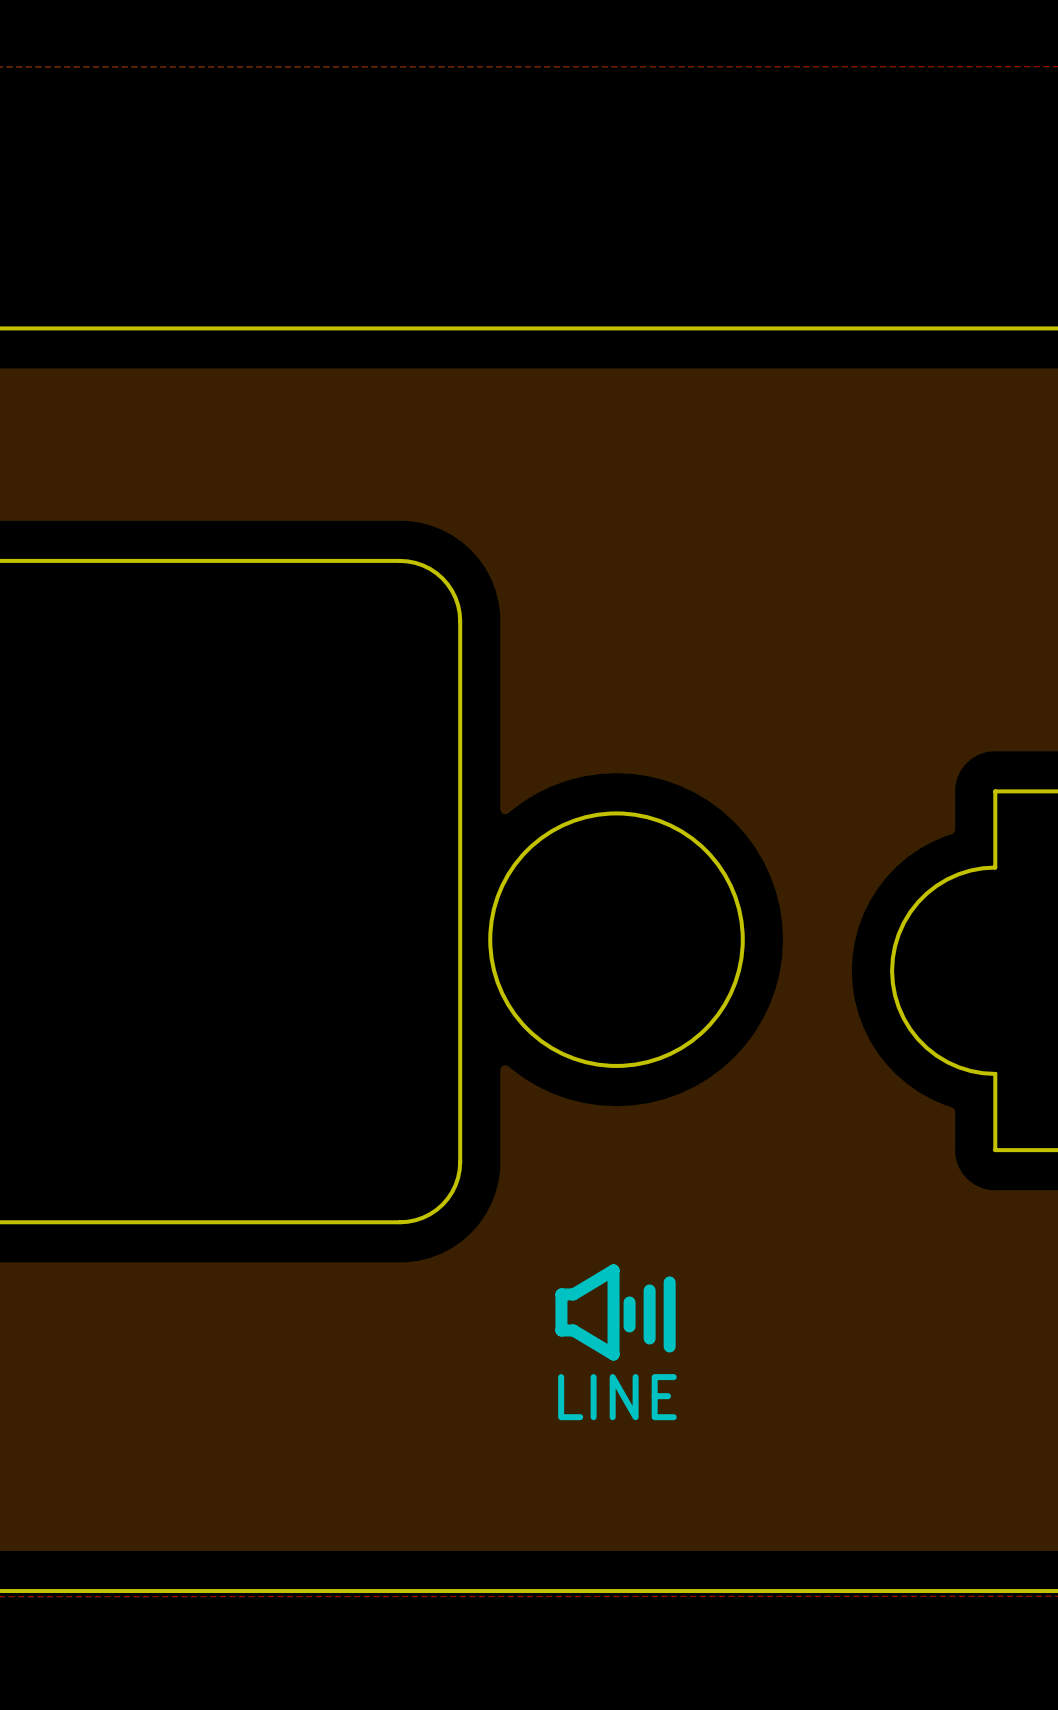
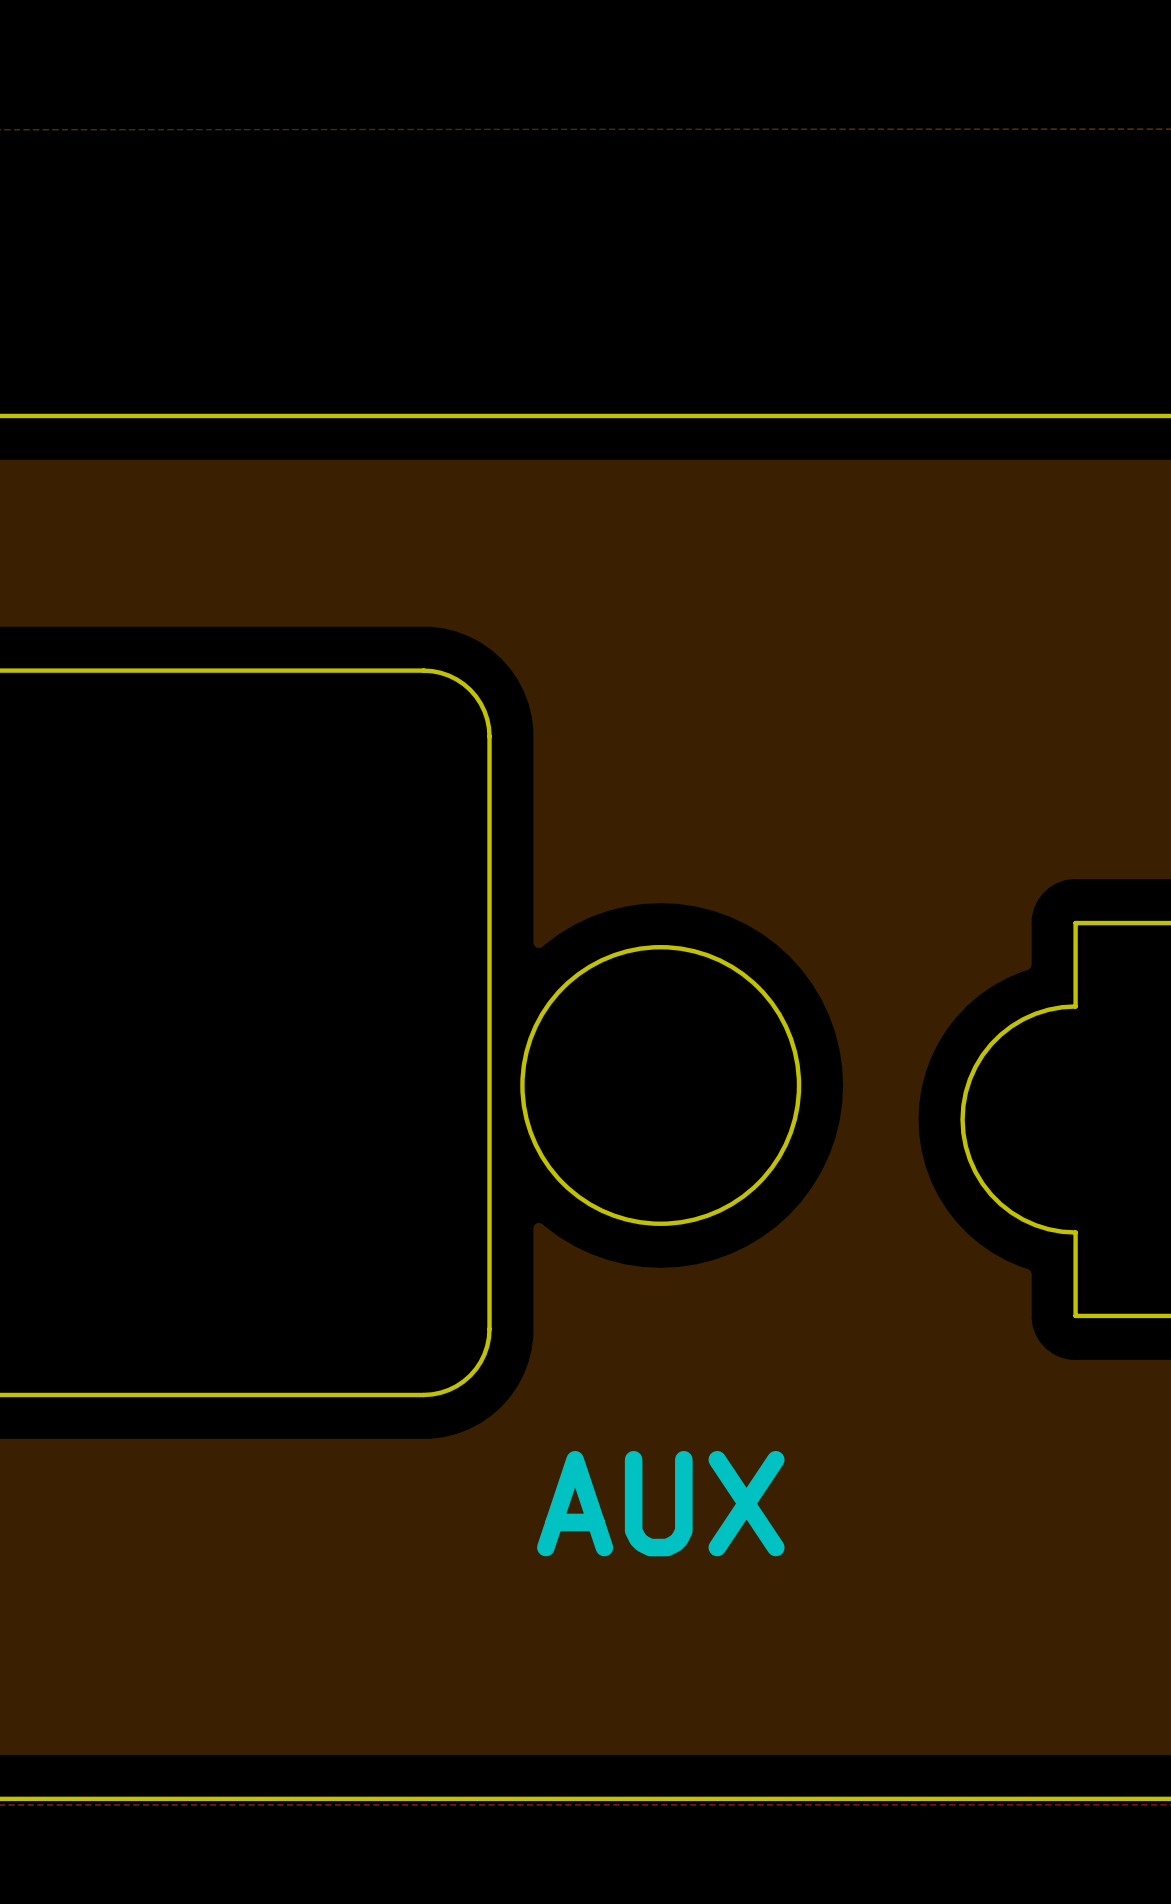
line: (613, 1270) (613, 1354) (573, 1330) (561, 1330) (561, 1294) (573, 1294) (613, 1270) -> none
line: (669, 1282) (669, 1346) -> none
line: (649, 1290) (649, 1338) -> none
line: (629, 1302) (629, 1326) -> none
text: none -> AUX (660, 1503)
text: LINE (617, 1397) -> none

